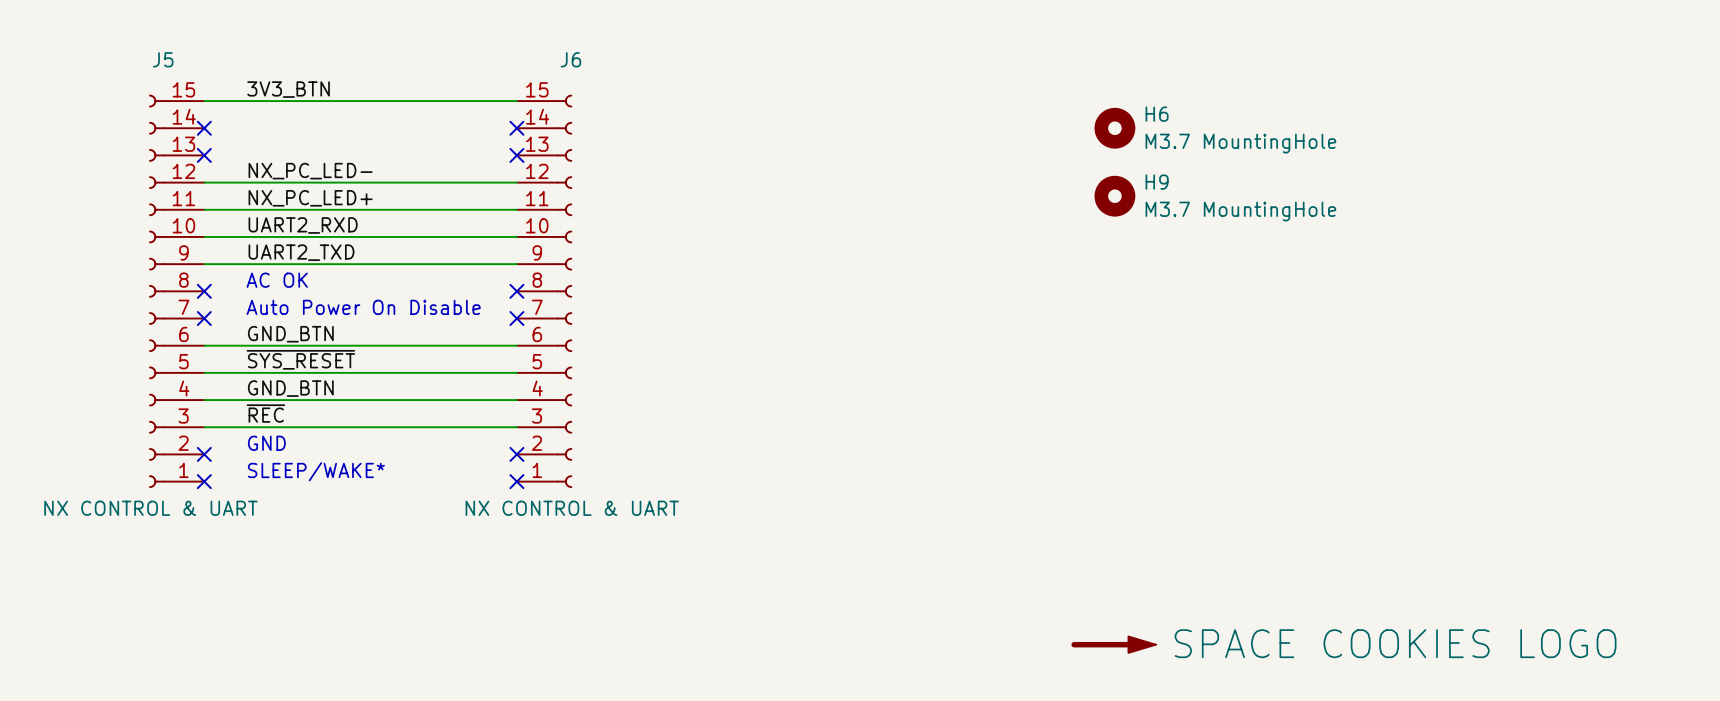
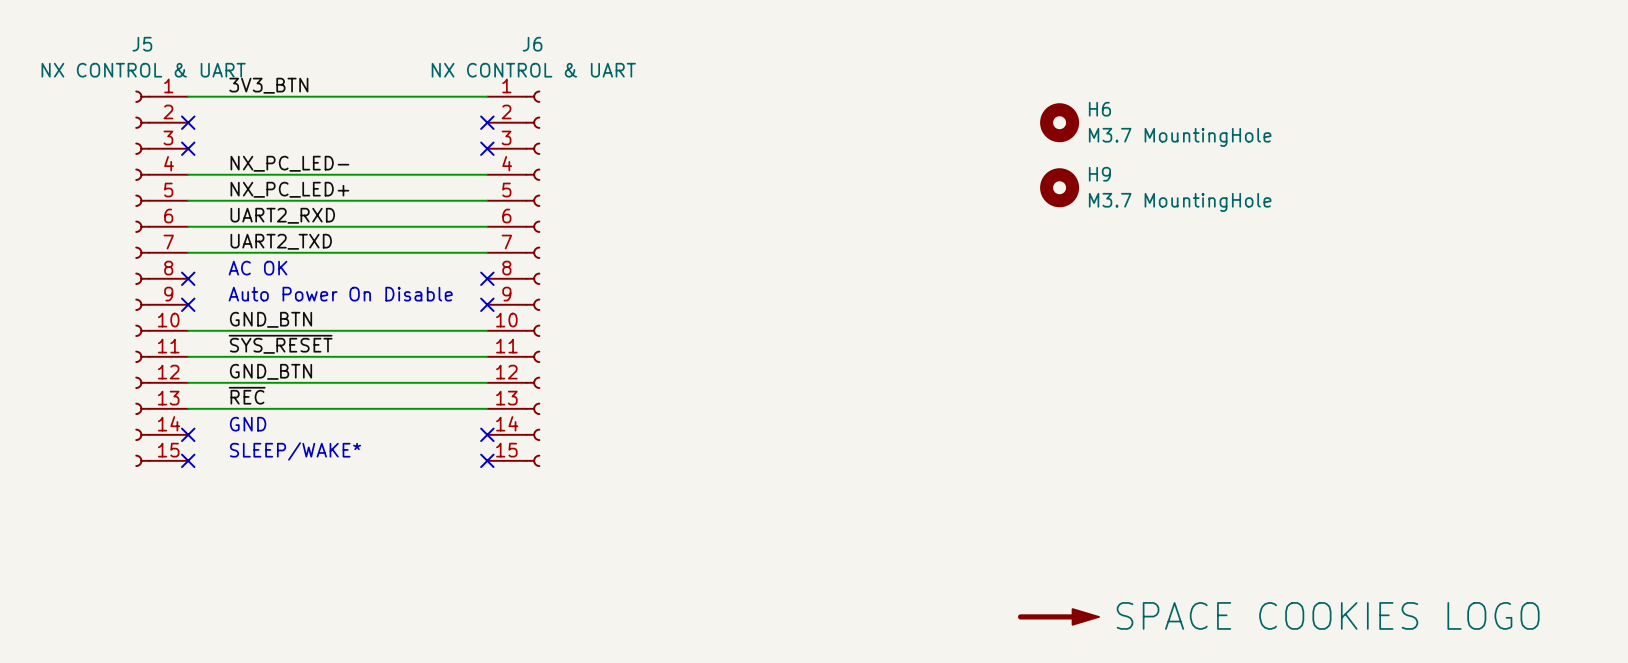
J5 flip: as is (156, 291) -> up-down (142, 278)
J6 flip: as is (564, 291) -> up-down (532, 278)

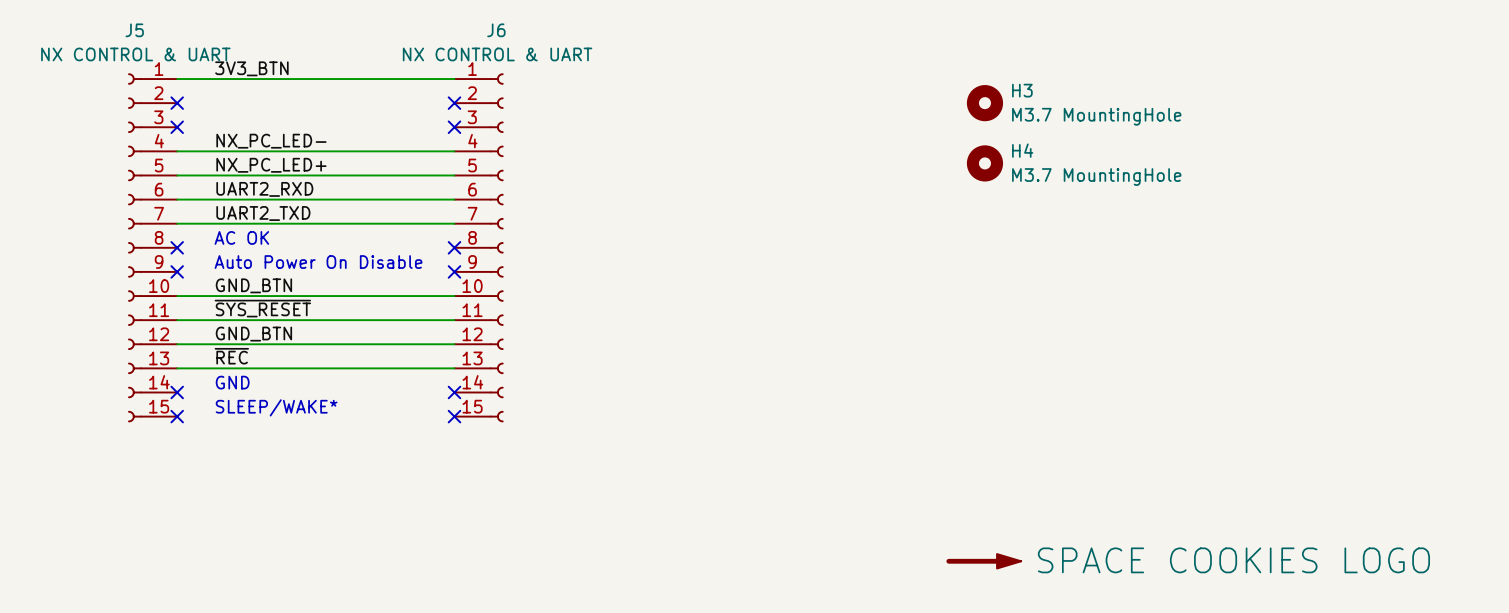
H6 name: H6 (1099, 109) -> H3 (1022, 90)
H9 name: H9 (1099, 174) -> H4 (1022, 150)

